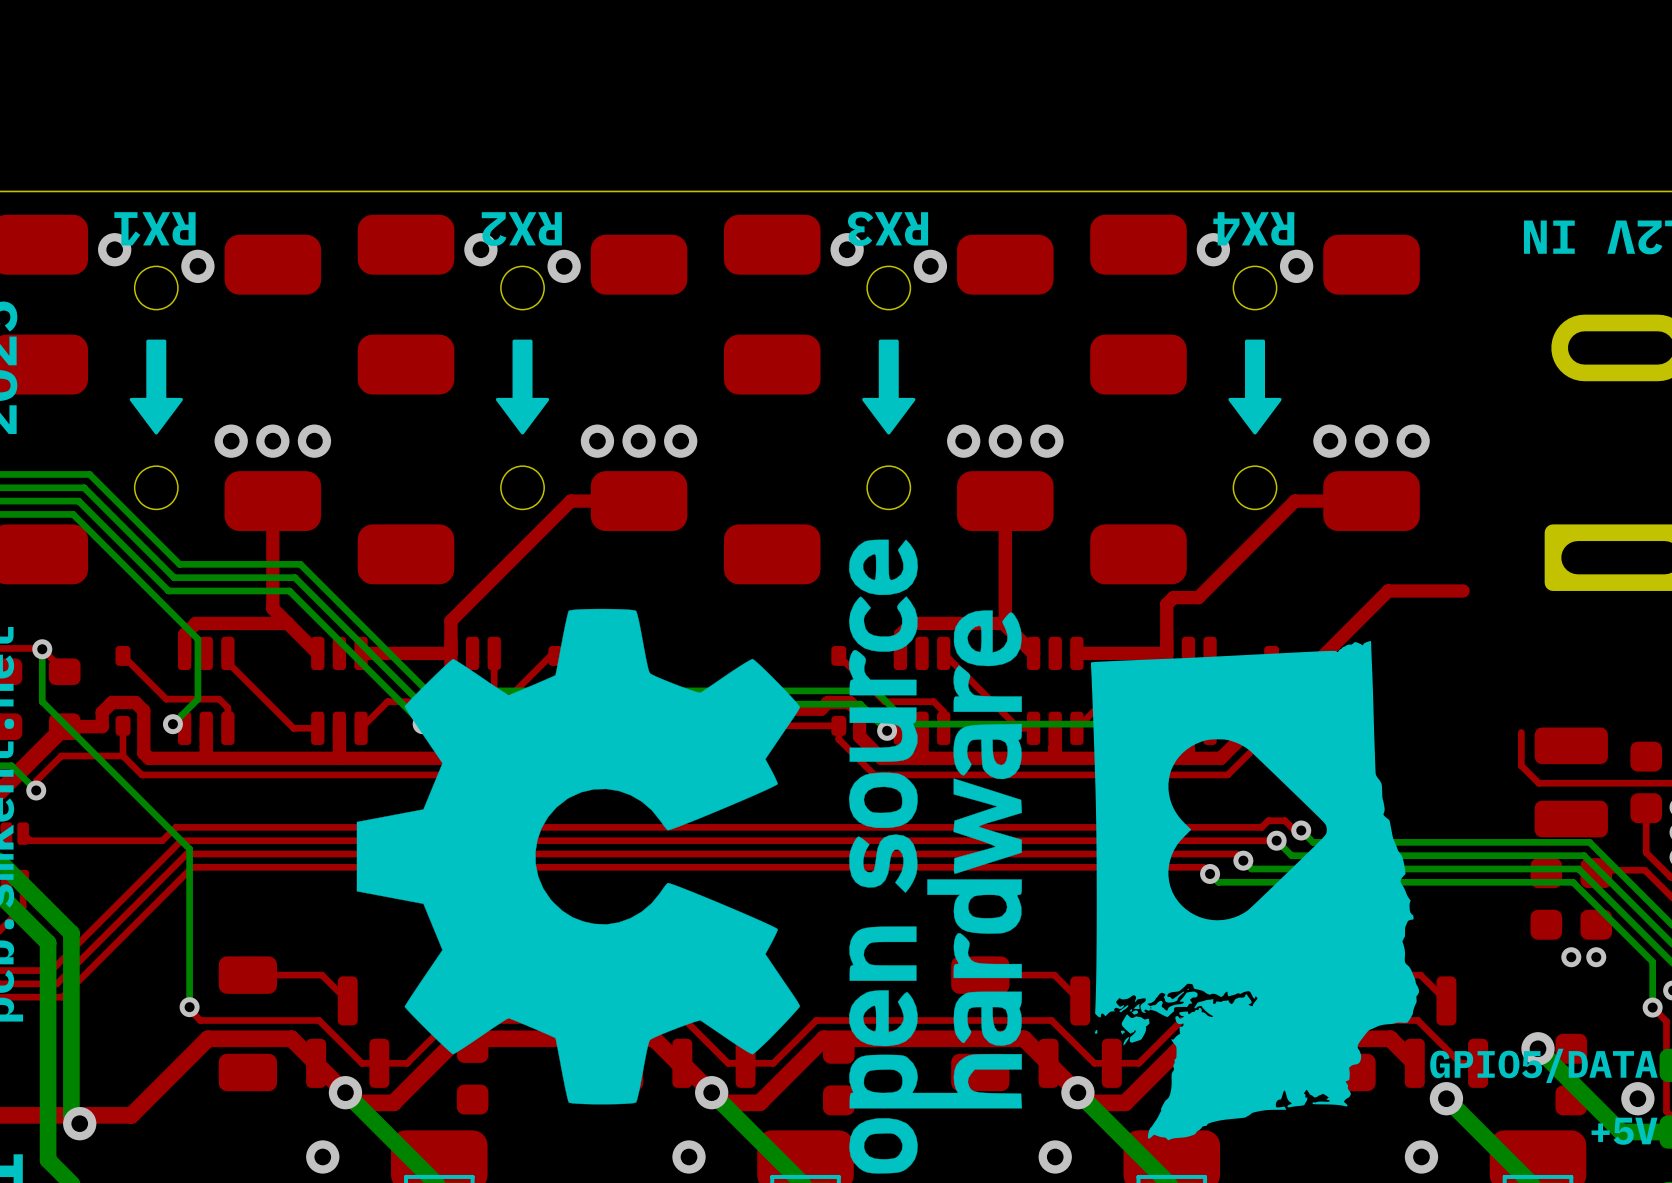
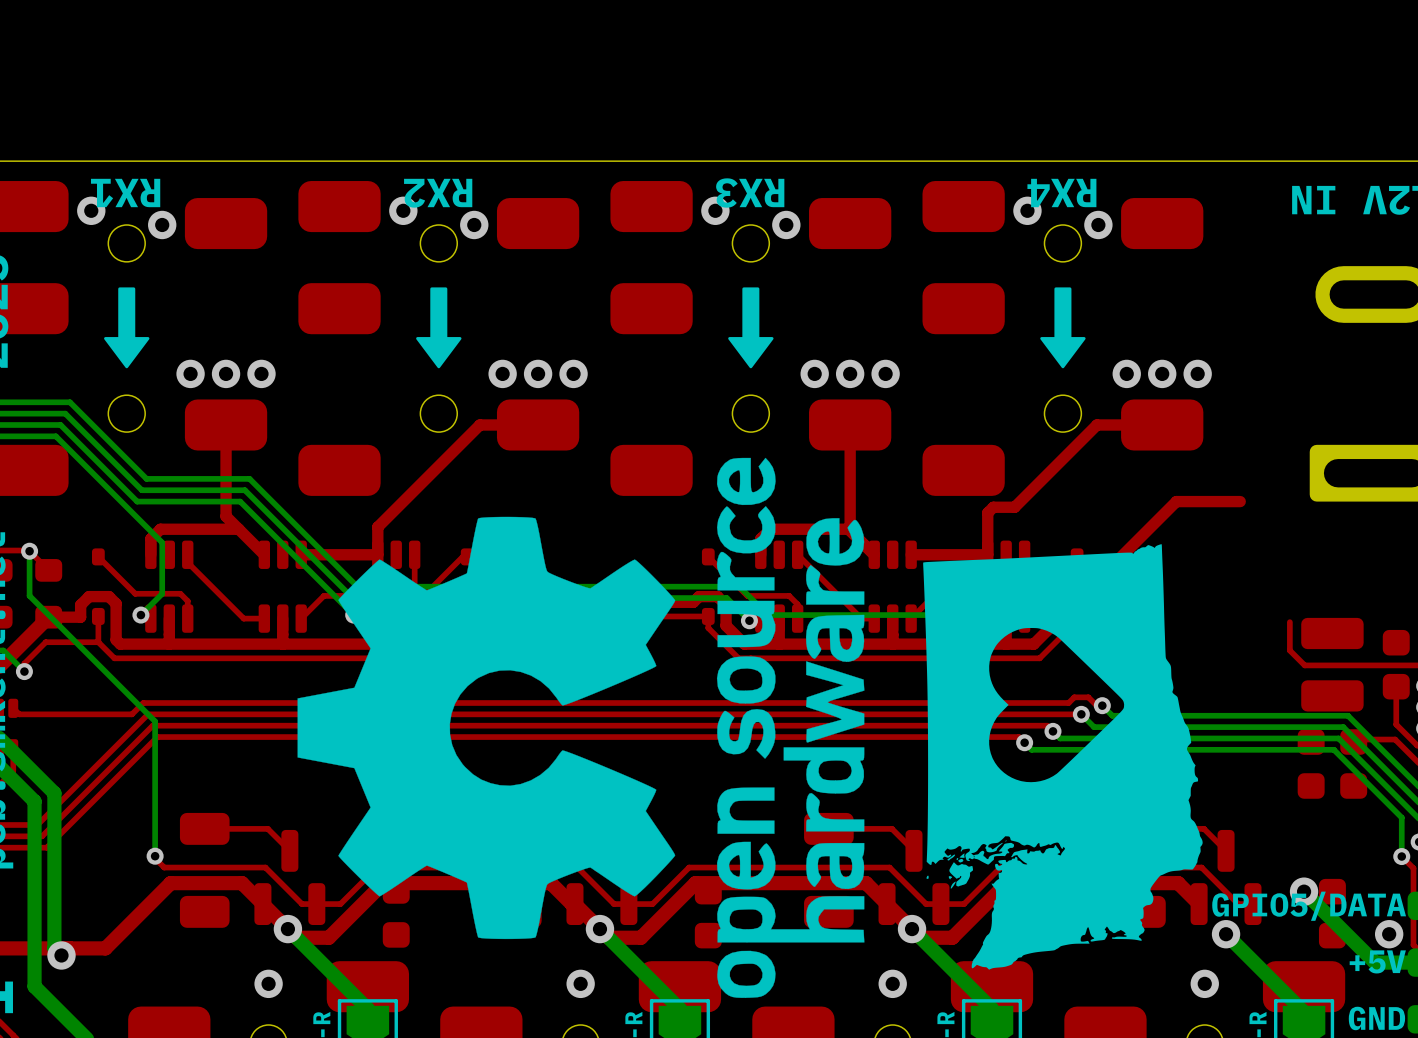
via: (1571, 957) -> none
via: (1596, 957) -> none

